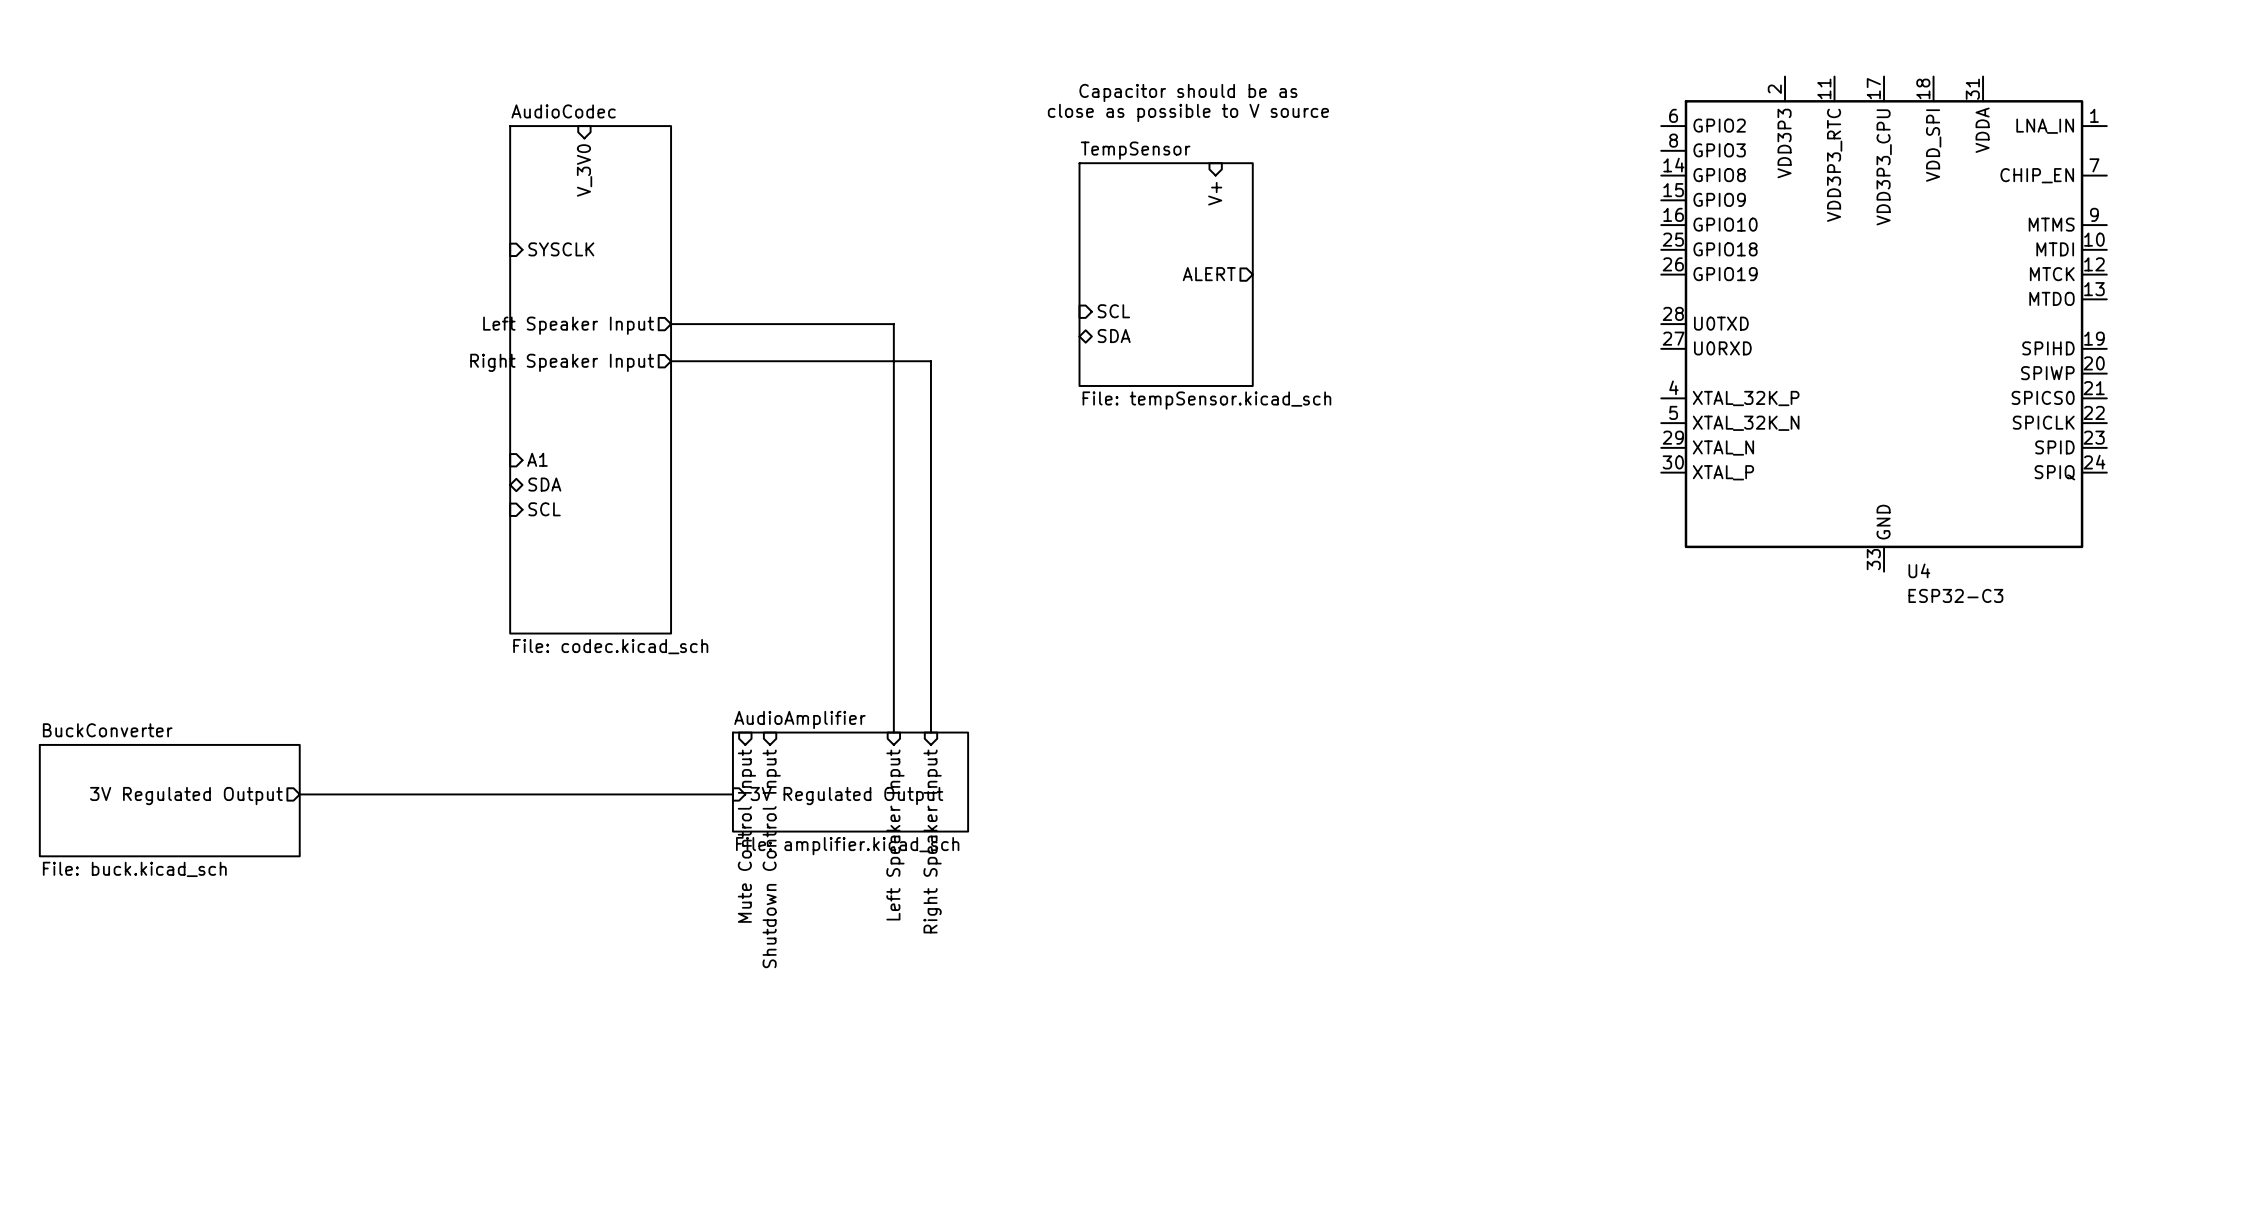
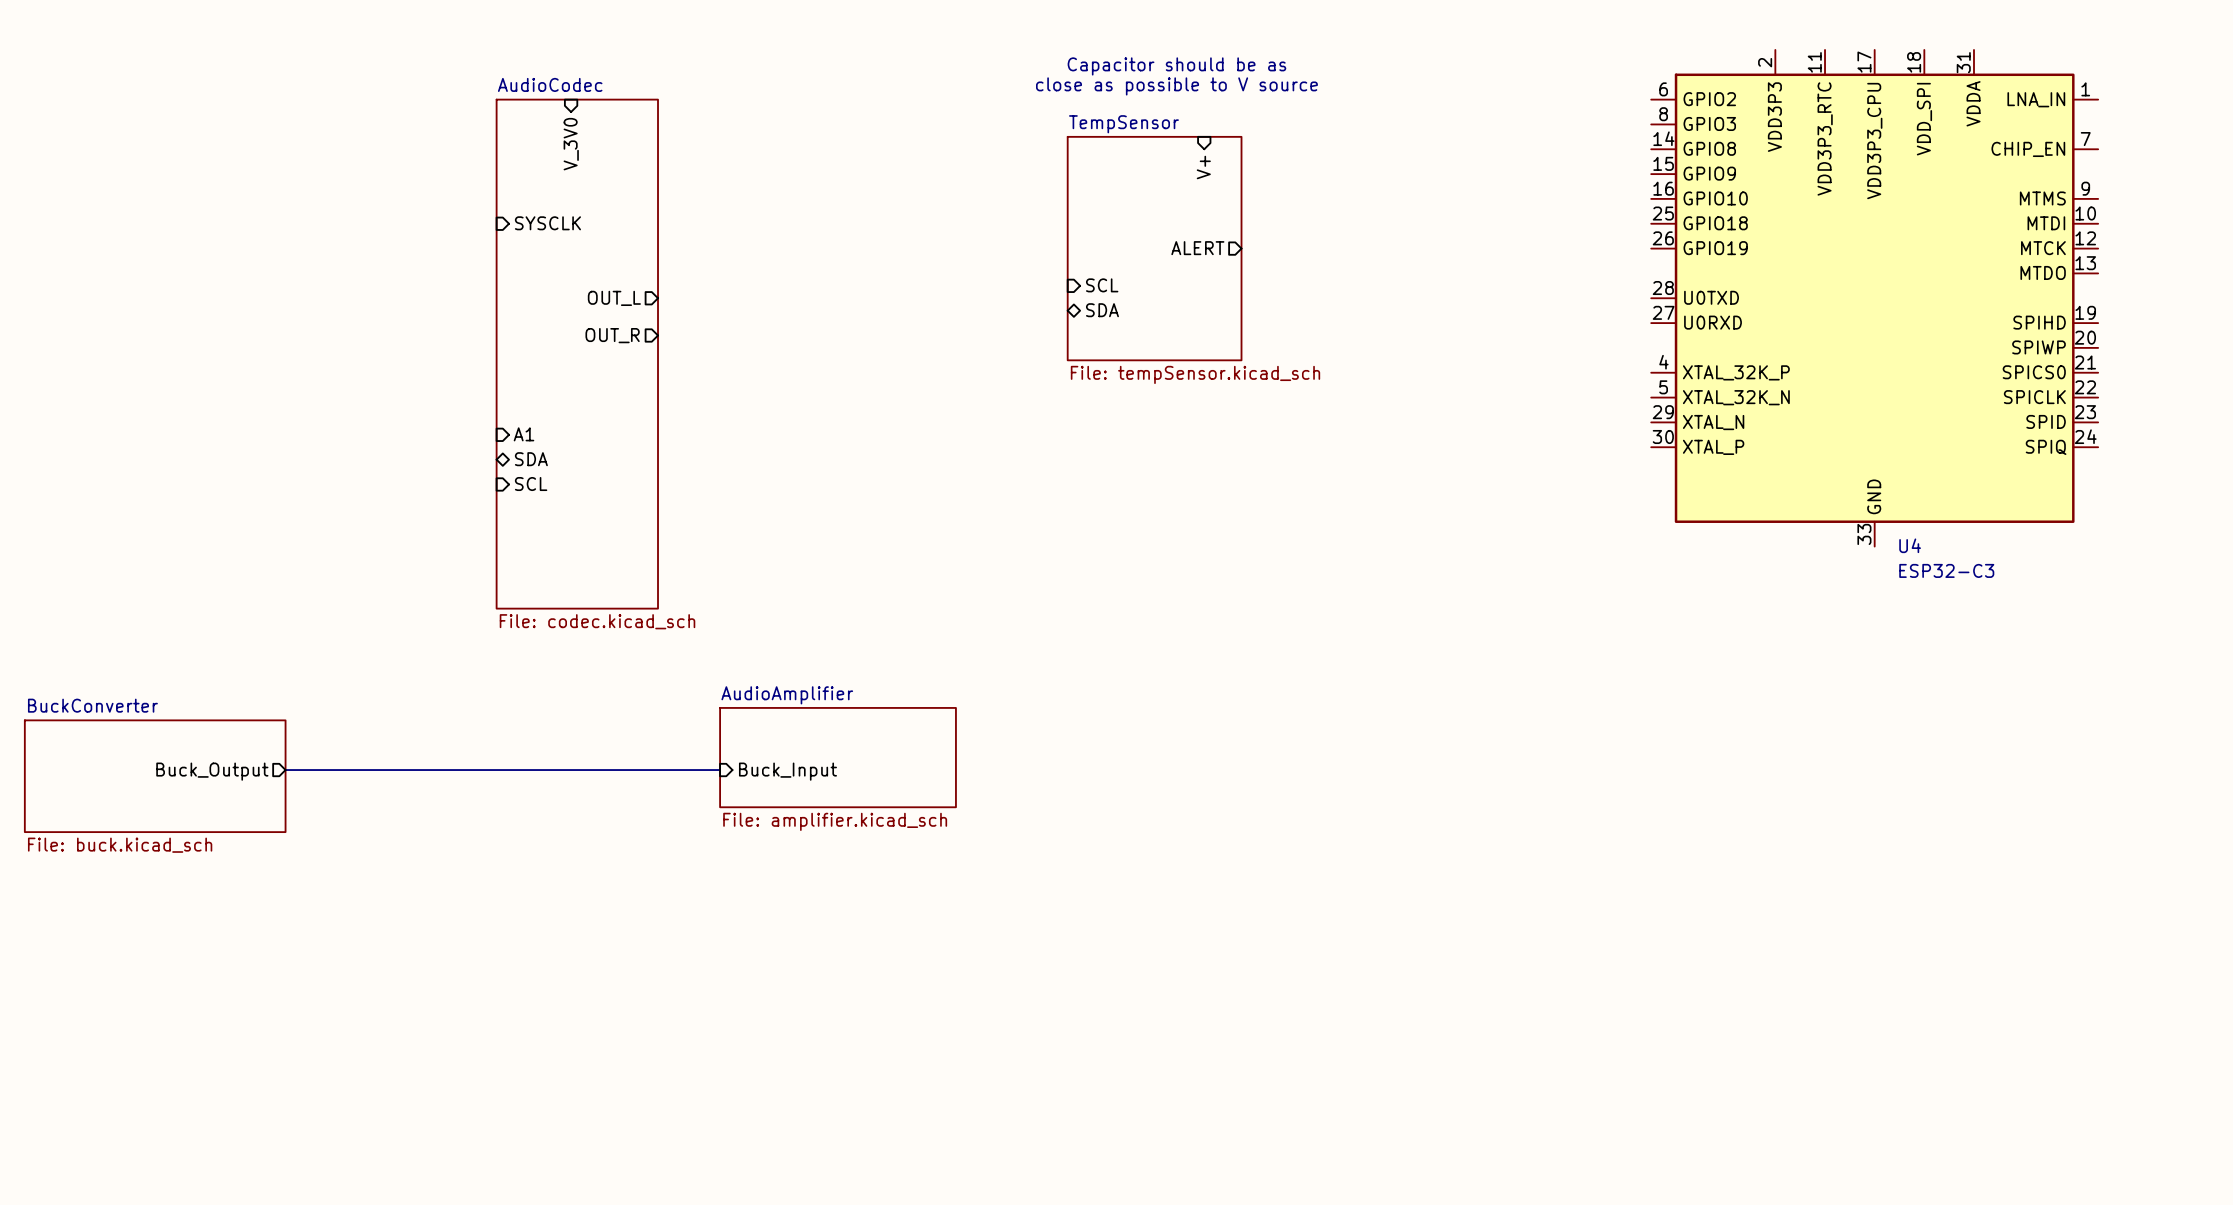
wire: (671, 324) (893, 324) (893, 732) -> none
sheet pin: Left Speaker Input (568, 325) -> OUT_L (614, 298)
wire: (671, 361) (930, 361) (930, 732) -> none
sheet pin: Right Speaker Input (562, 362) -> OUT_R (612, 335)
sheet pin: 3V Regulated Output (186, 796) -> Buck_Output (212, 771)
sheet pin: 3V Regulated Output (846, 796) -> Buck_Input (787, 771)
sheet pin: Left Speaker Input (895, 835) -> none
sheet pin: Mute Control Input (746, 836) -> none
sheet pin: Right Speaker Input (932, 841) -> none
sheet pin: Shutdown Control Input (771, 858) -> none

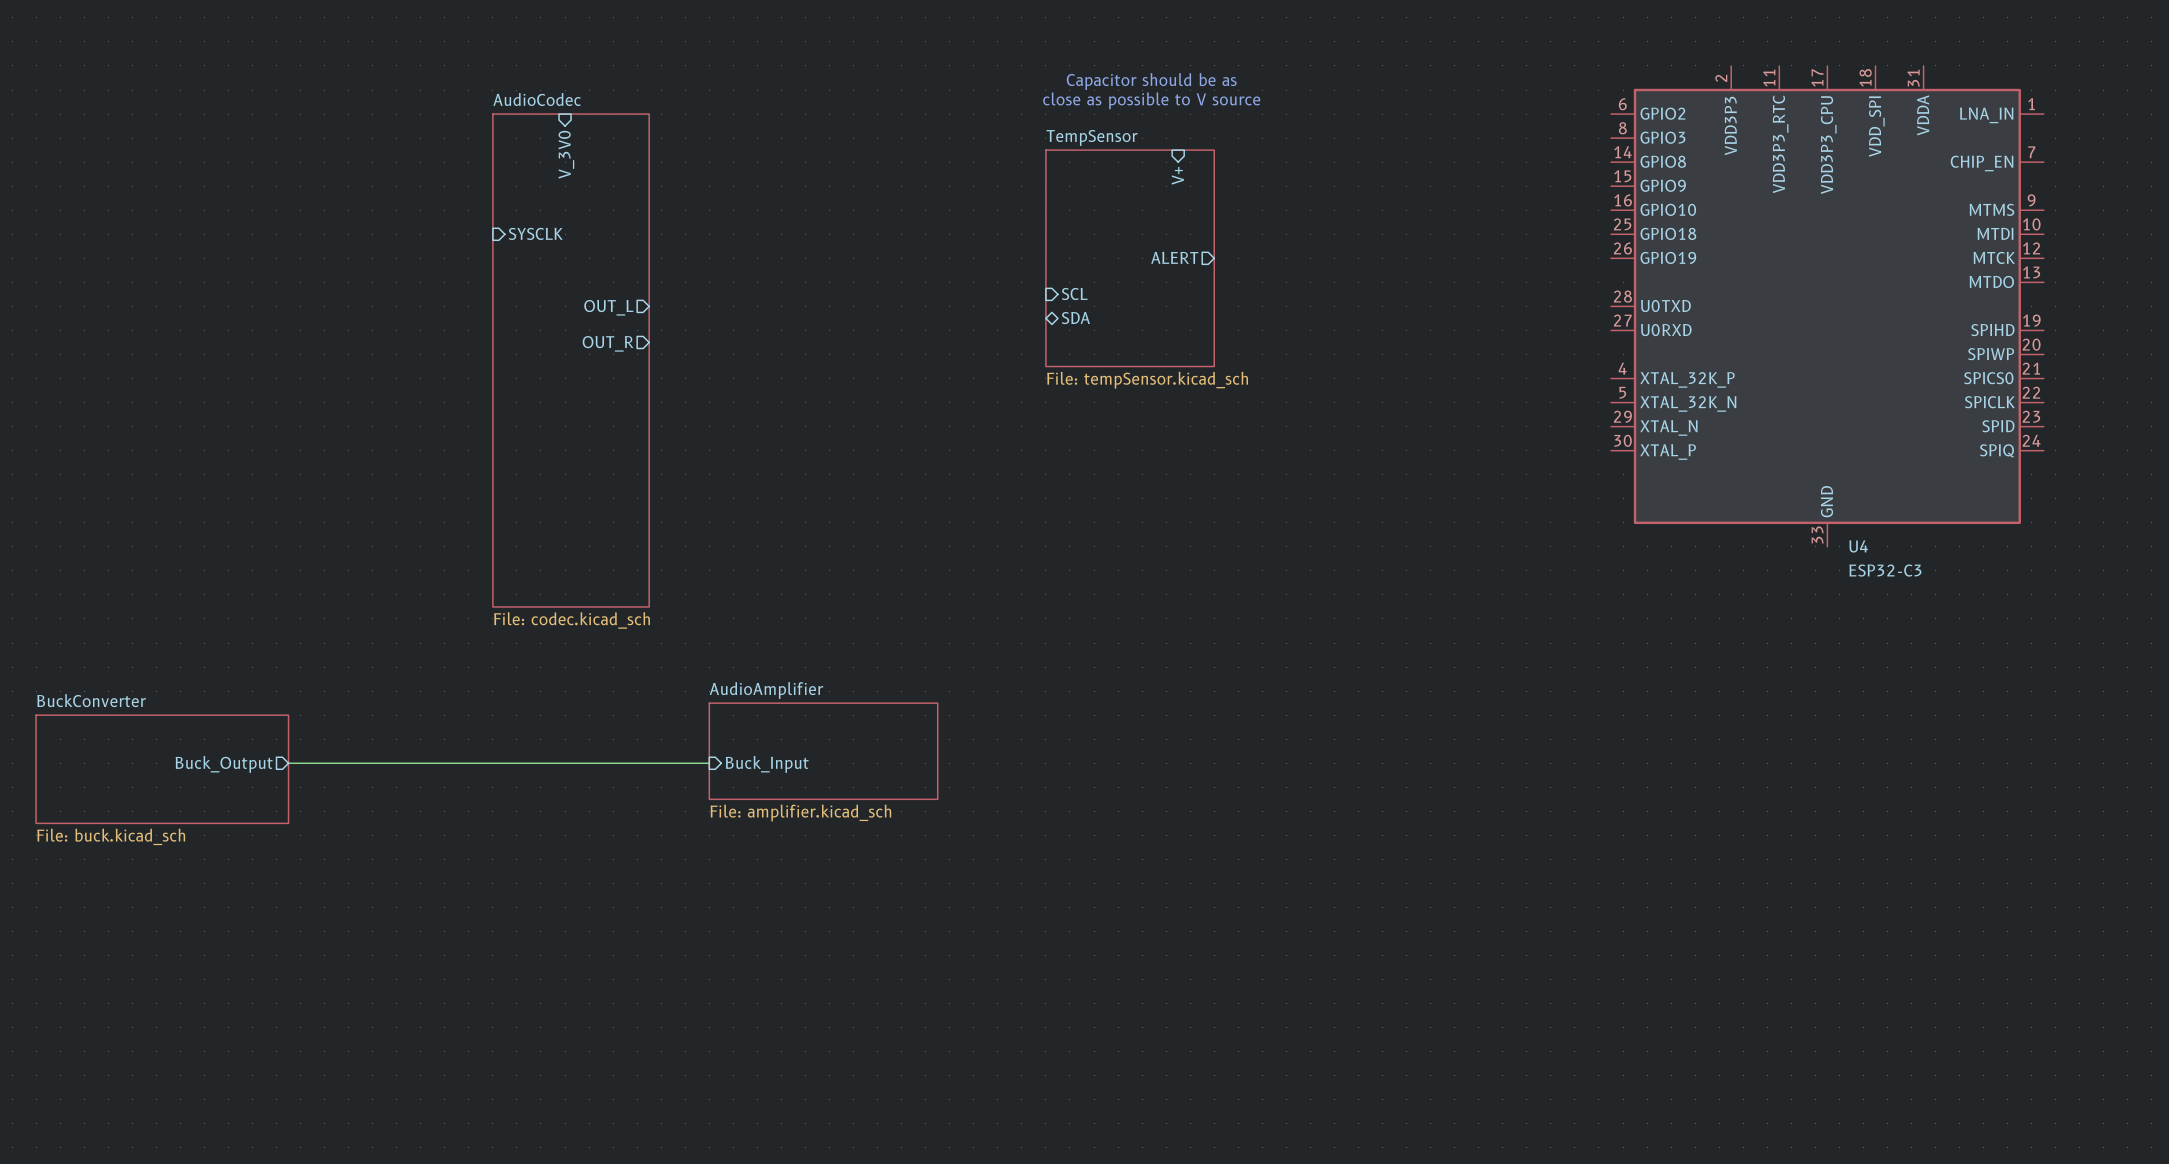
sheet pin: A1 (524, 434) -> none
sheet pin: SDA (531, 459) -> none
sheet pin: SCL (531, 484) -> none

